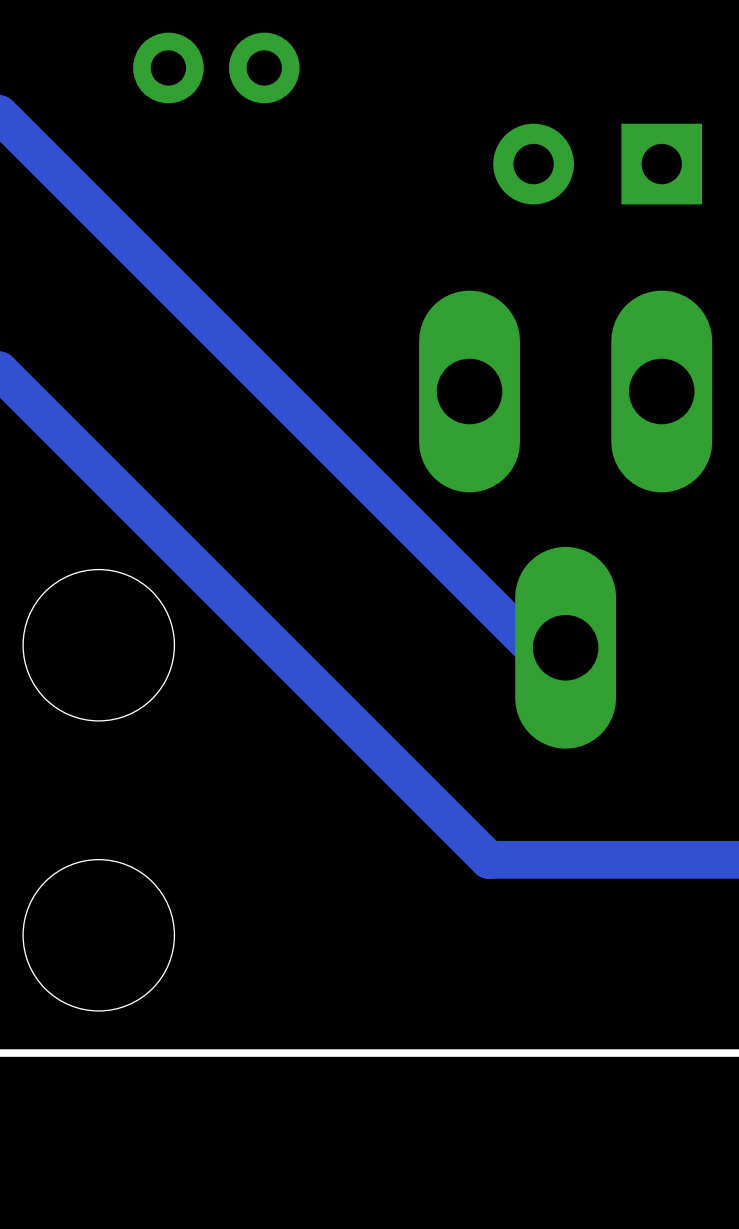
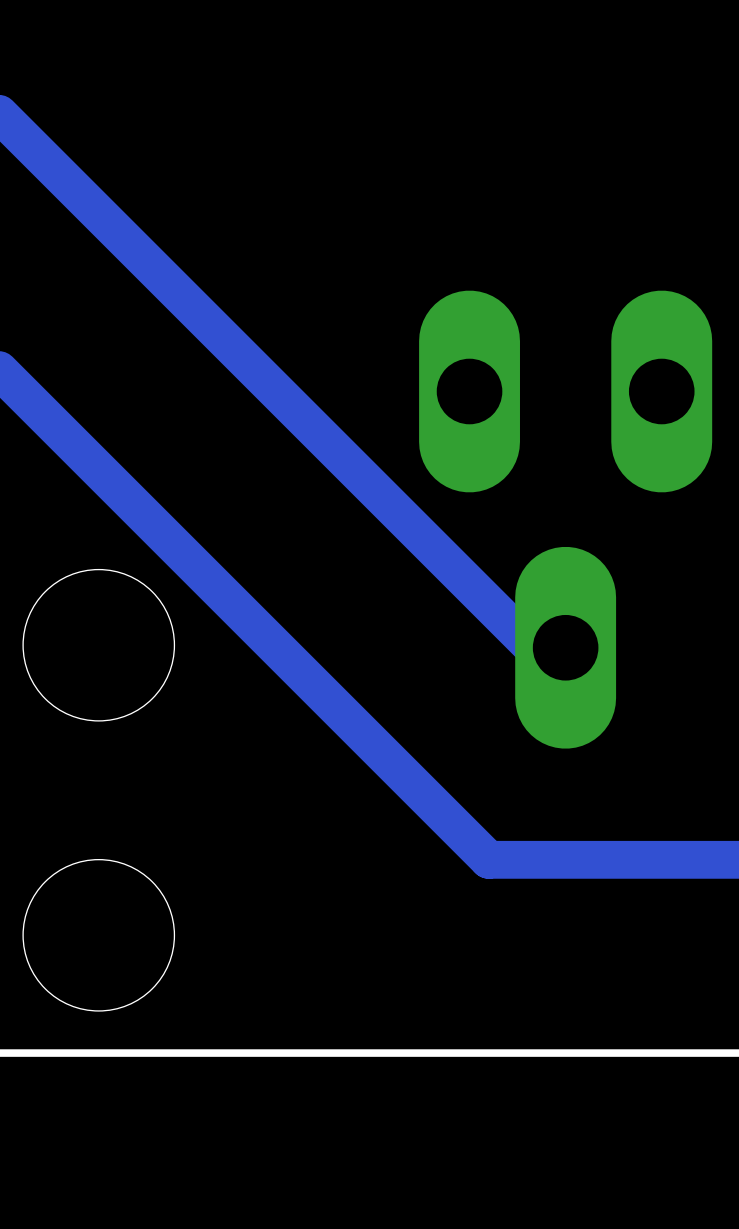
part: (216, 67) -> none
part: (597, 164) -> none

